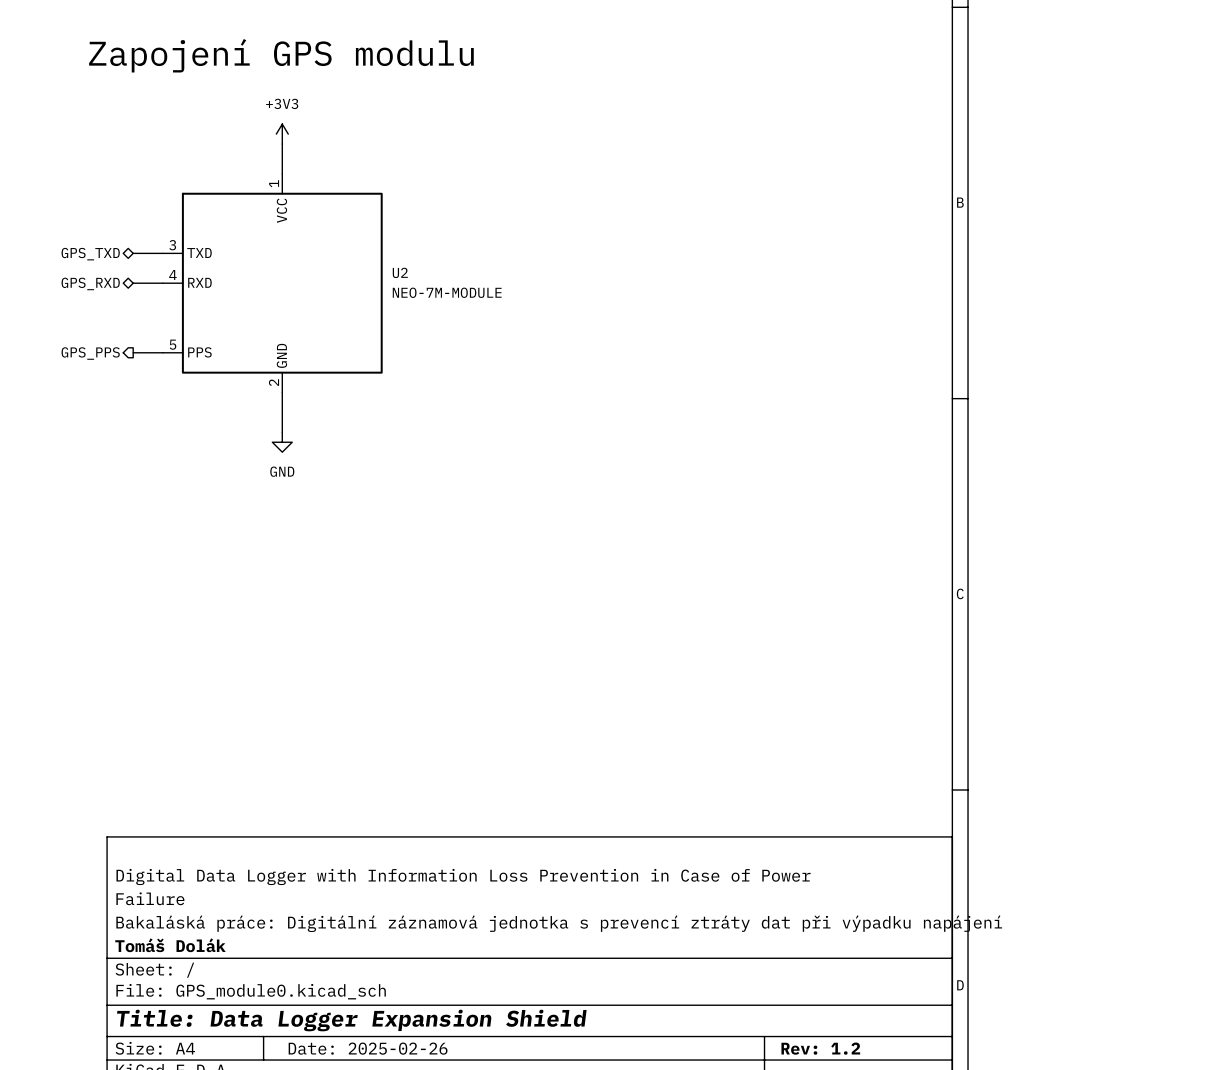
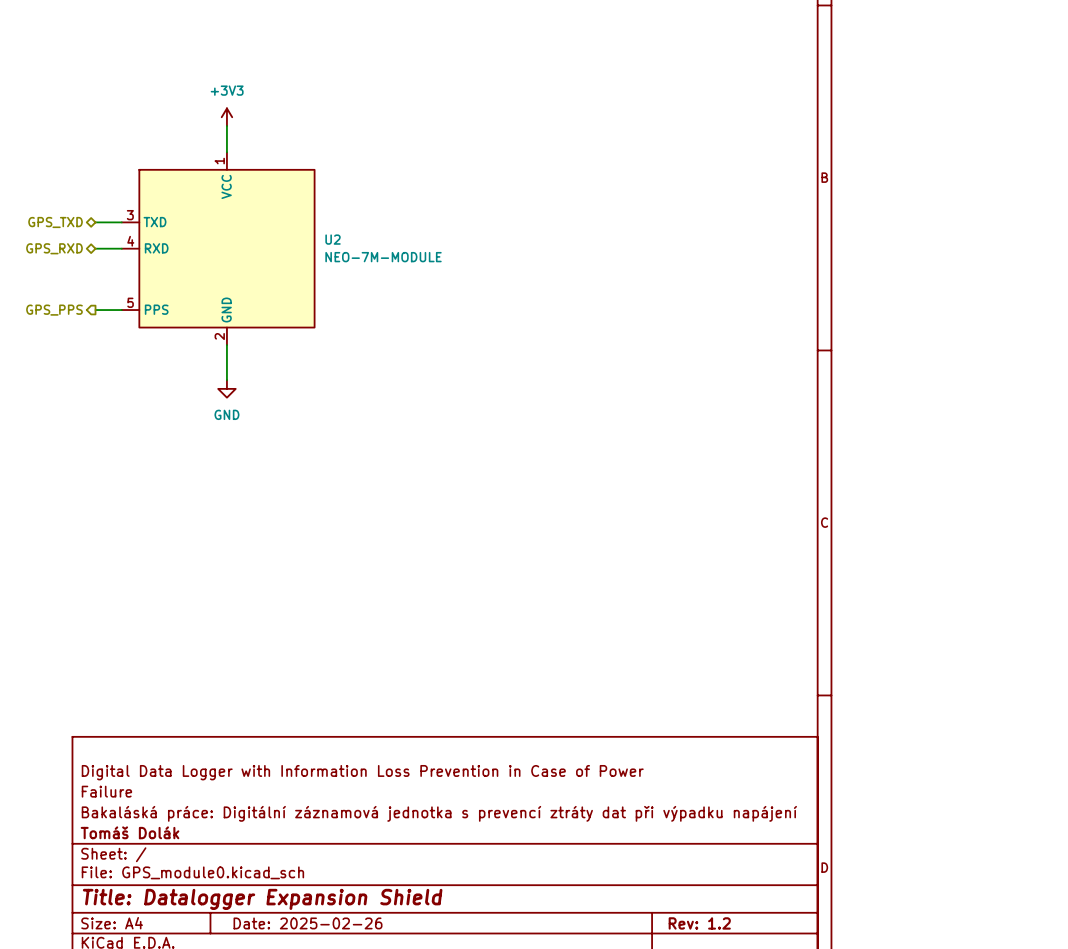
text: Zapojení GPS modulu (281, 55) -> none
title block: Title: Data Logger Expansion Shield (351, 1020) -> Title: Datalogger Expansion Shield (262, 899)

